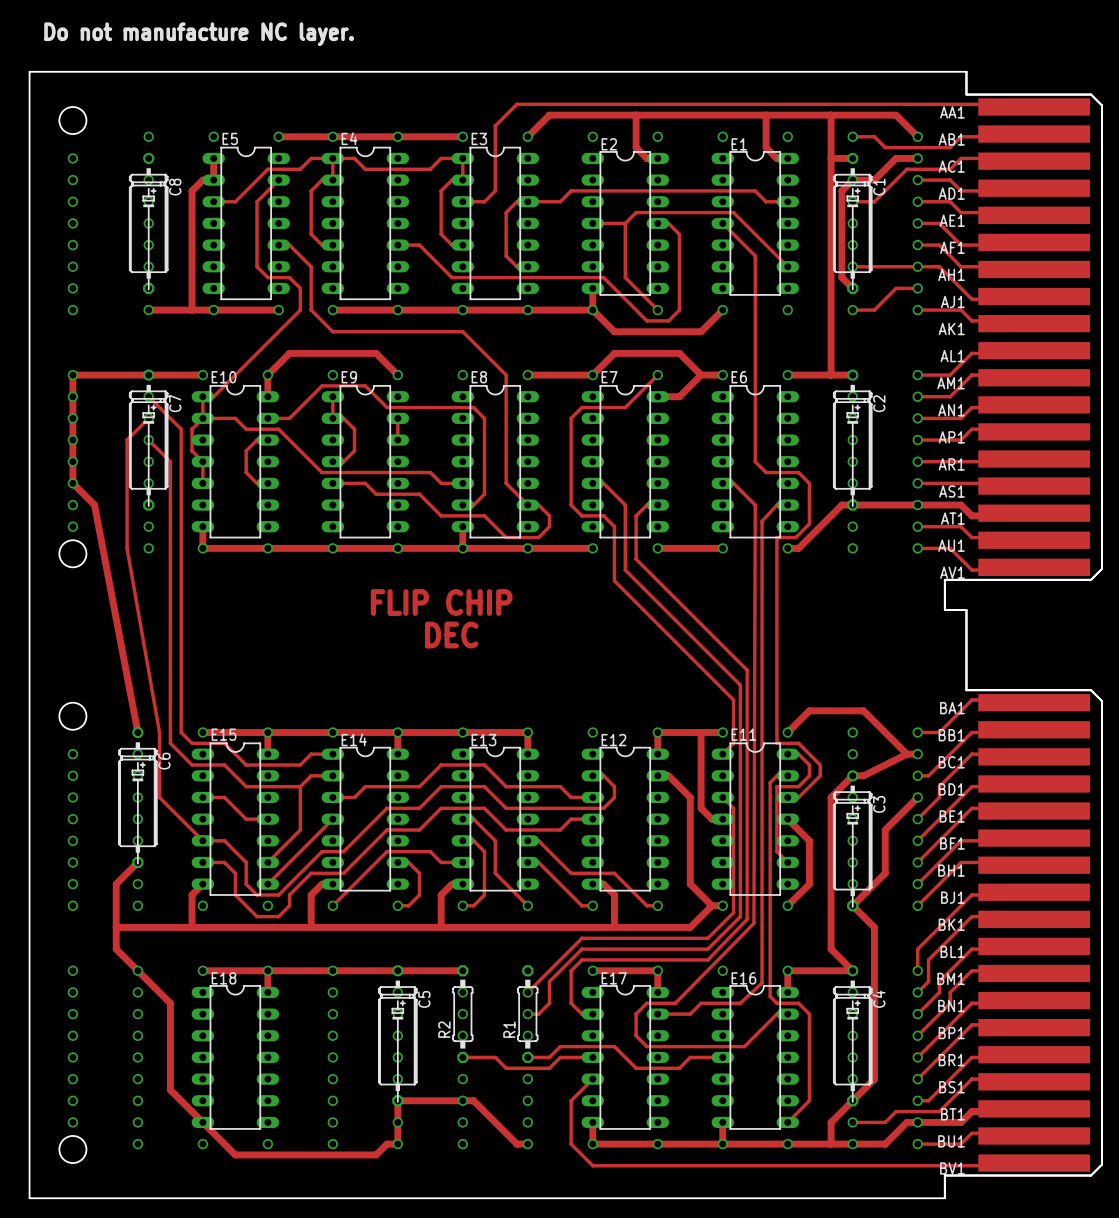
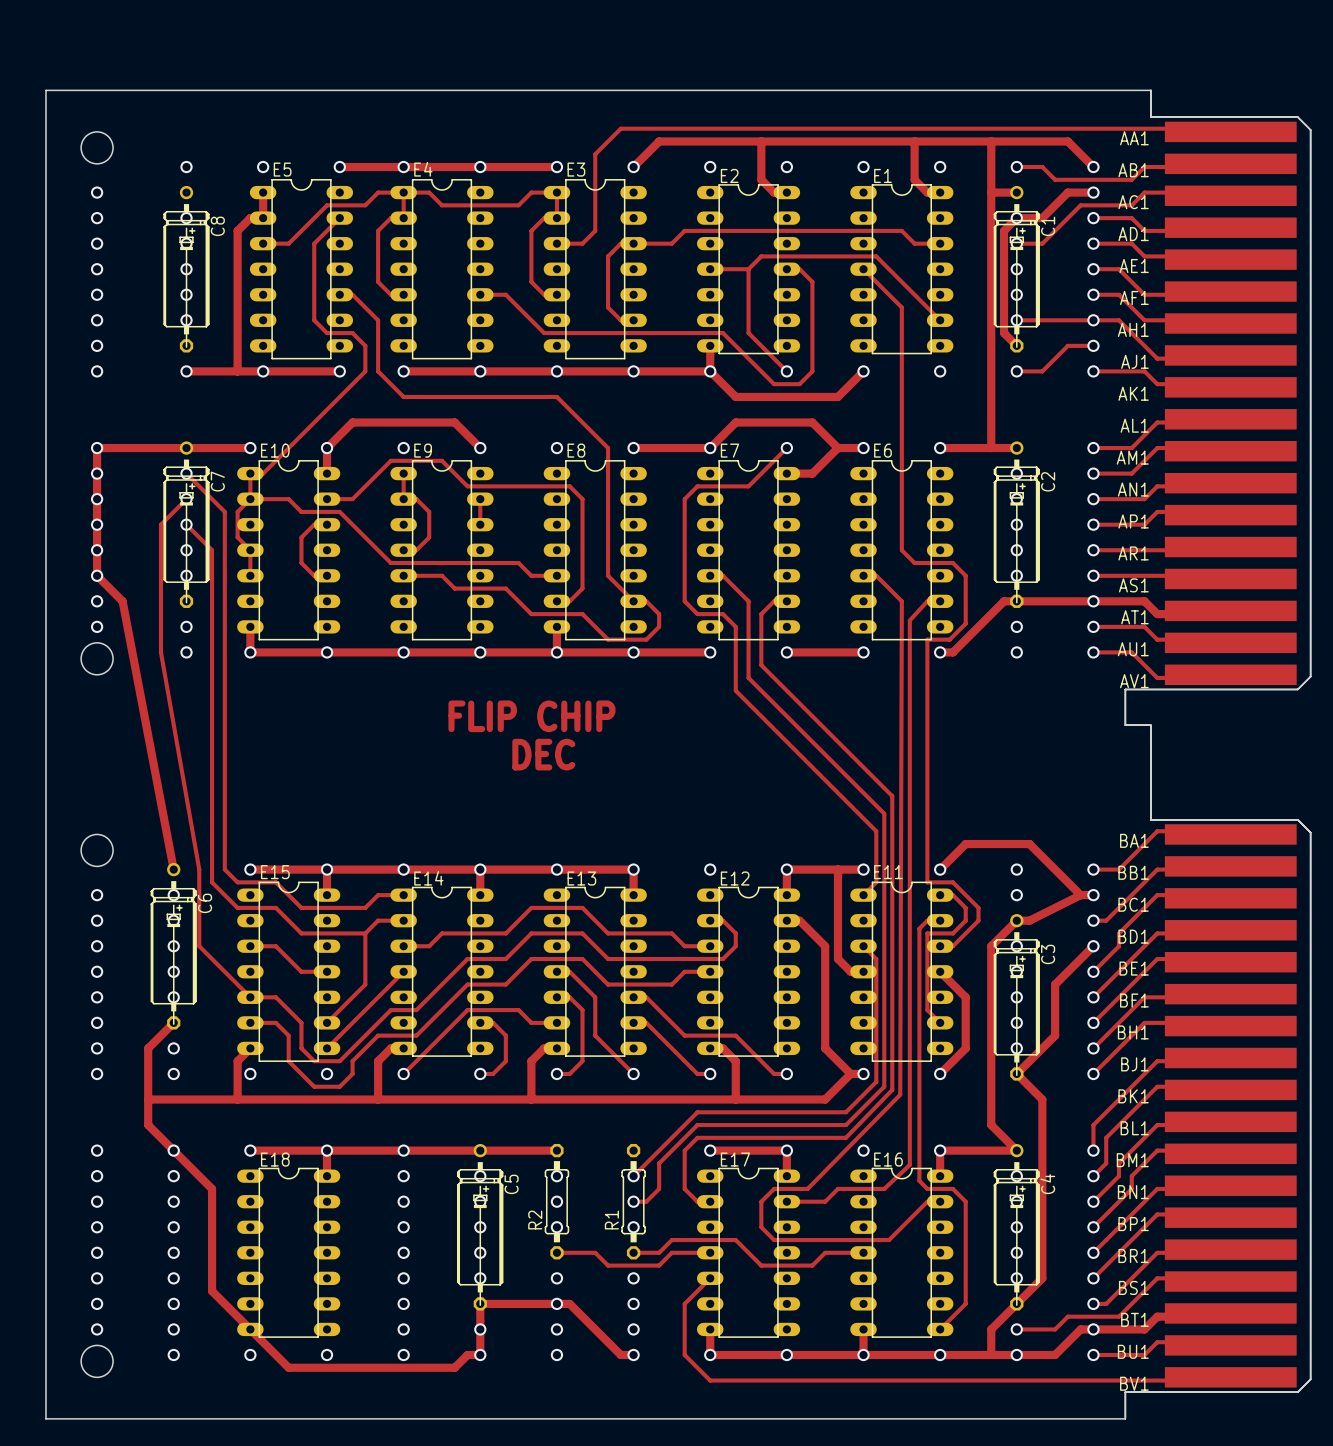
text: Do not manufacture NC layer. (199, 34) -> none

